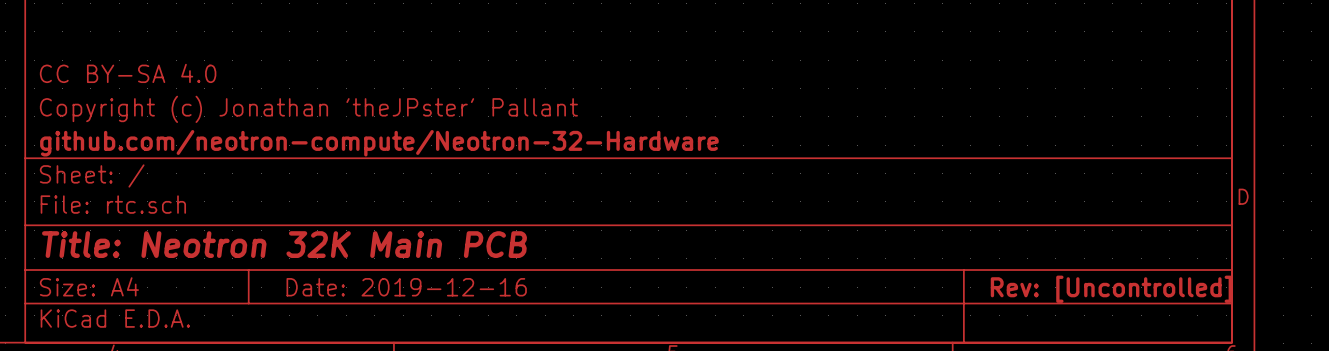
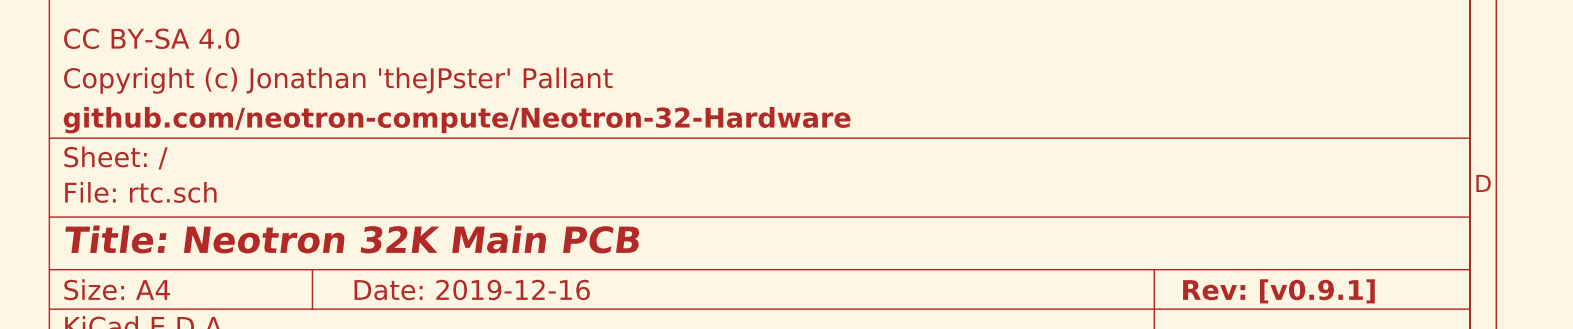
title block: Rev: [Uncontrolled] (1111, 289) -> Rev: [v0.9.1] (1278, 291)

